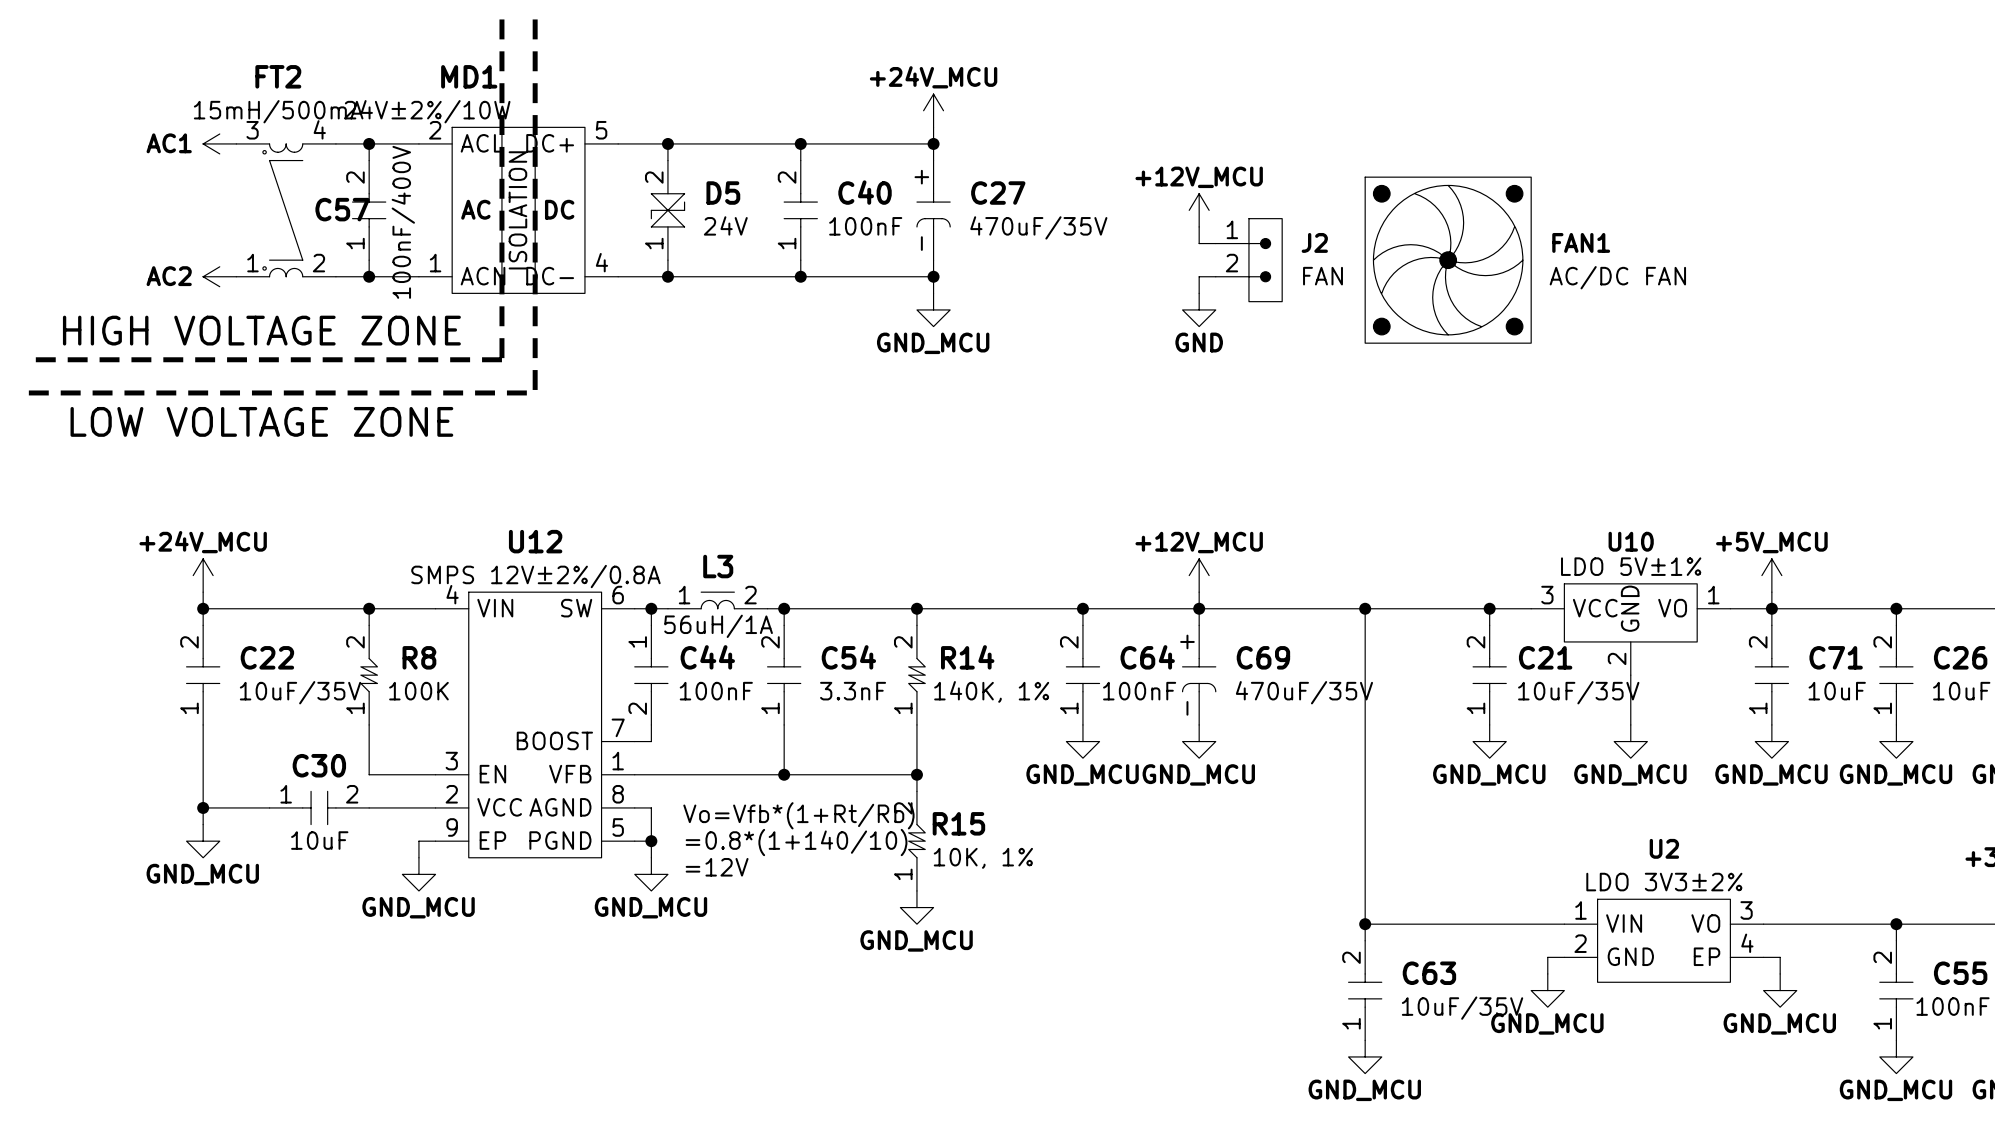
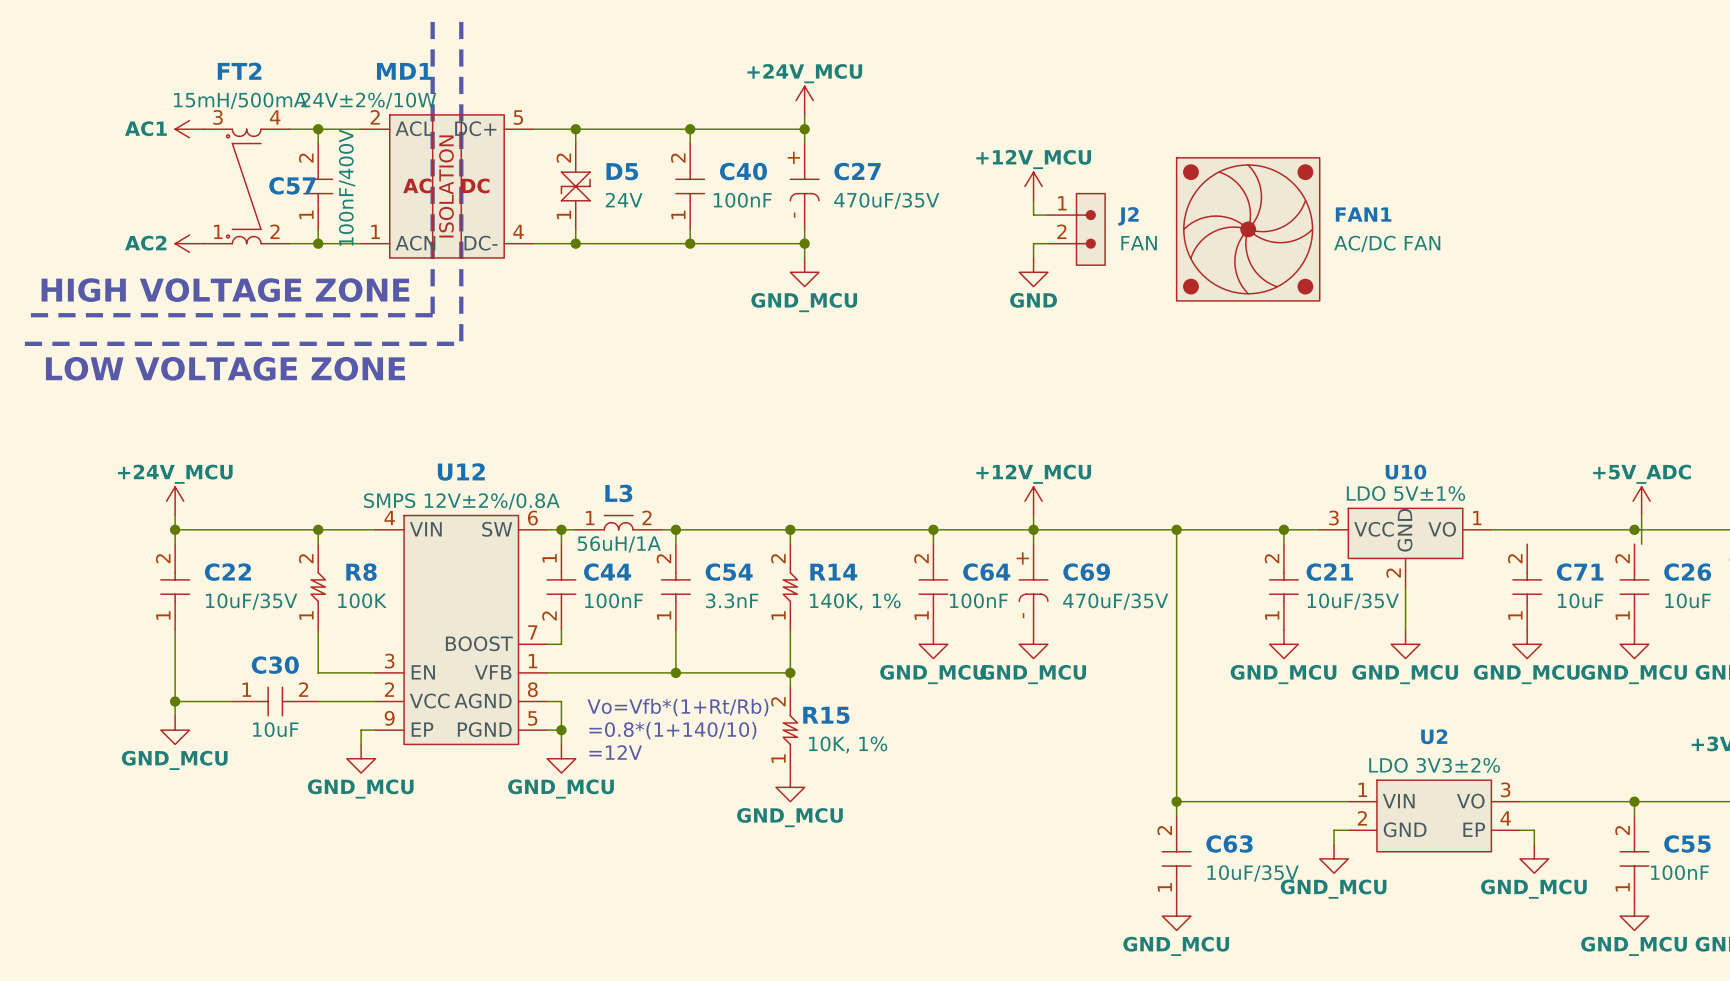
power symbol: +5V_MCU (1771, 575) -> none
power symbol: none -> +5V_ADC (1641, 501)
wire: (1771, 592) (1771, 625) -> (1641, 515) (1641, 544)
junction: (1771, 608) -> none
wire: (1896, 608) (1896, 625) -> none

